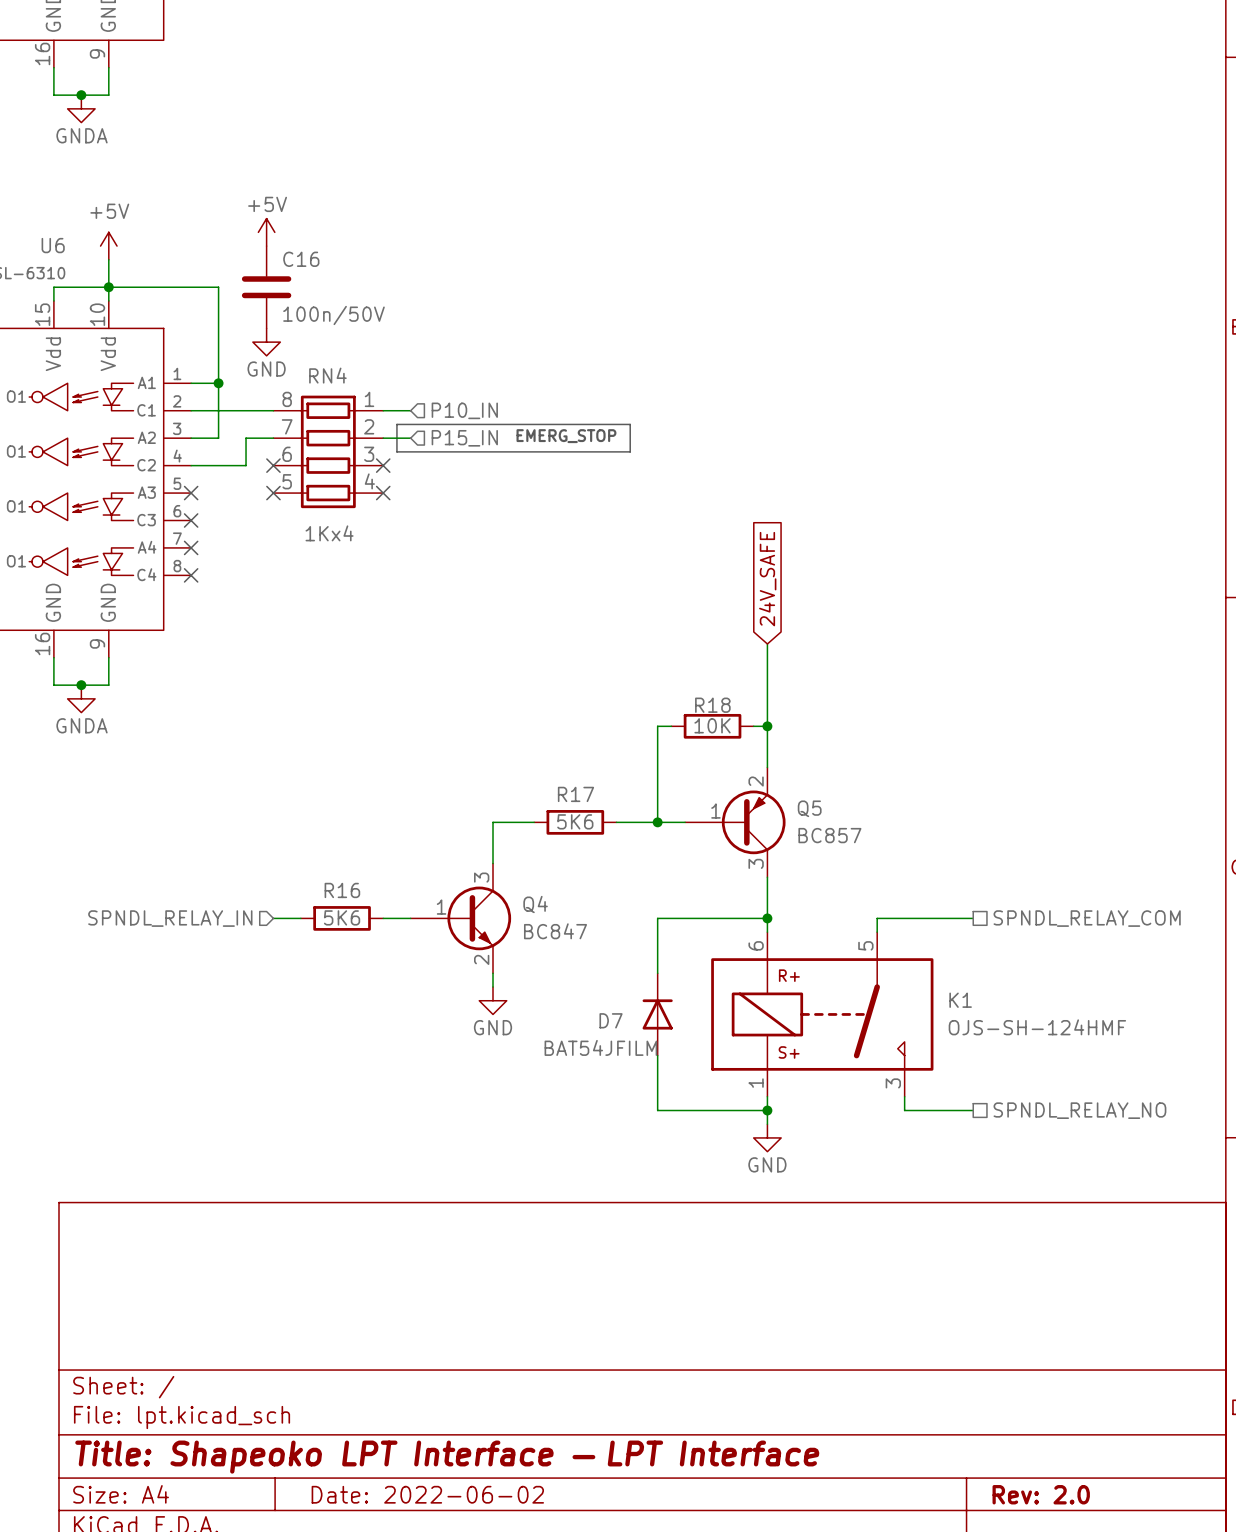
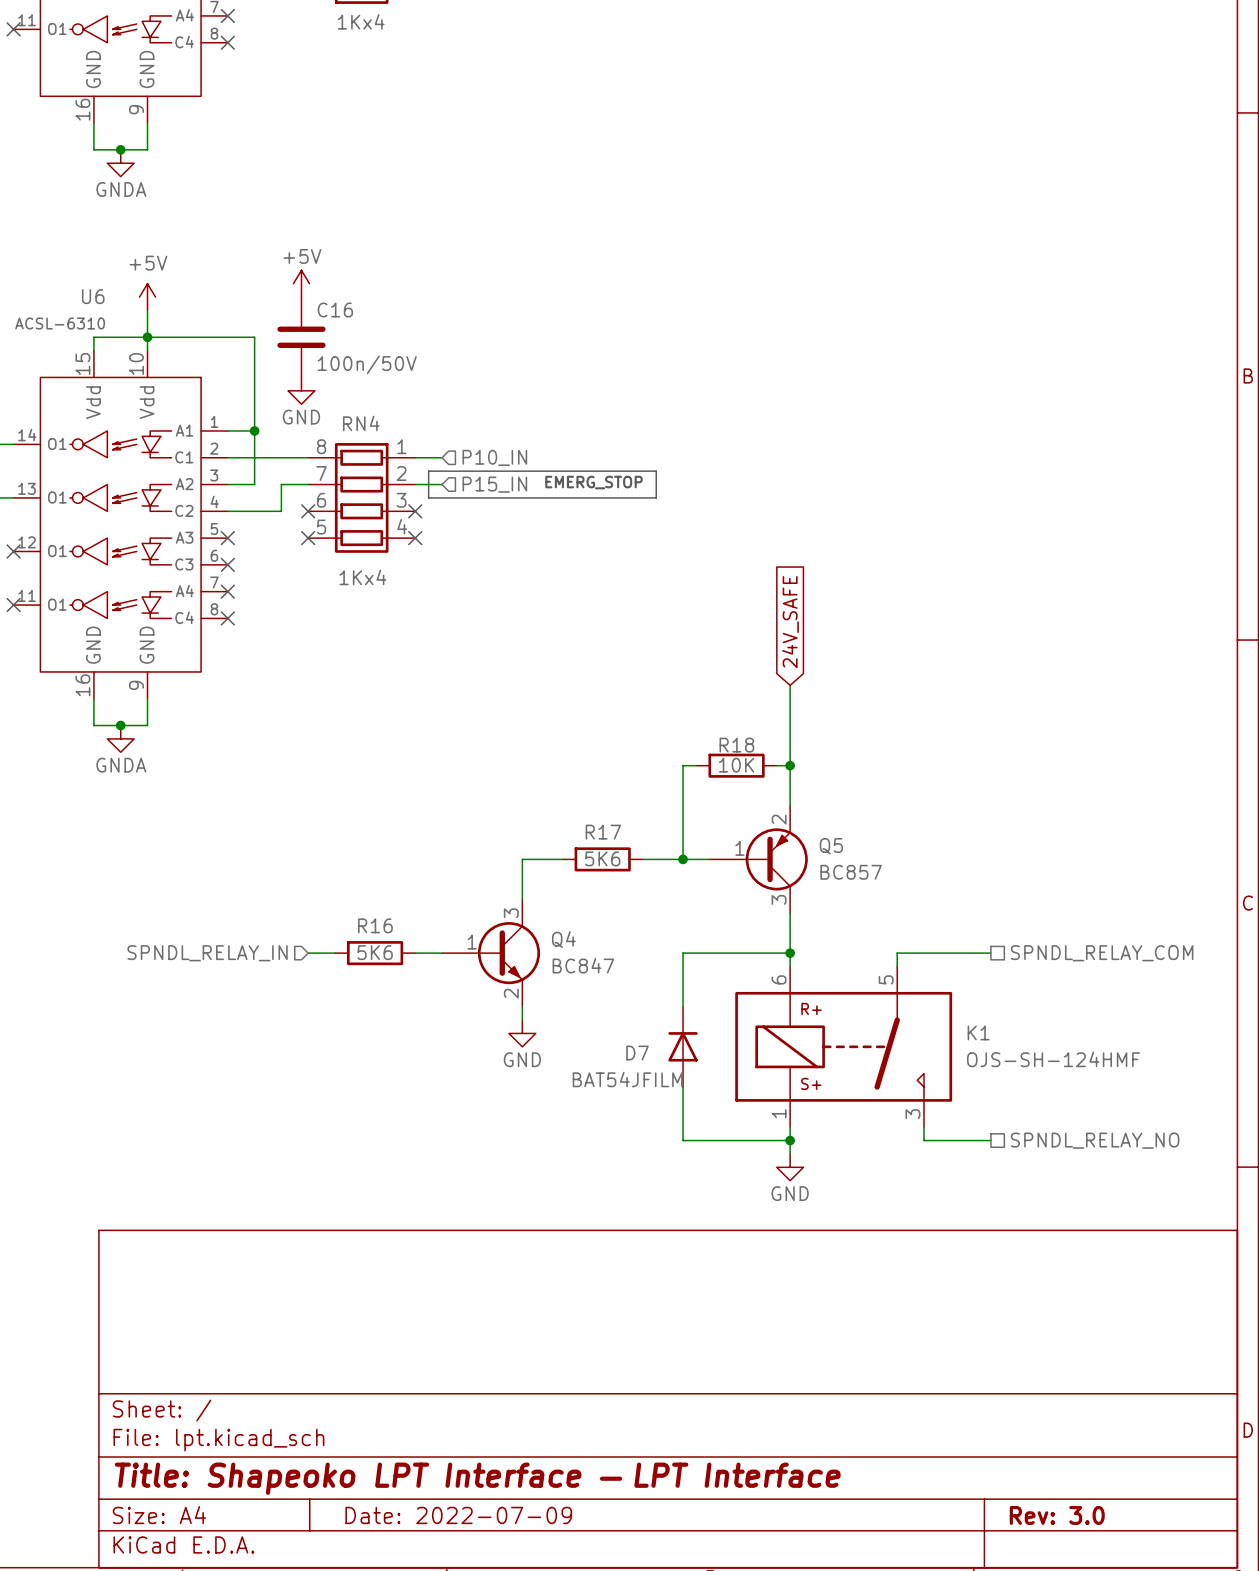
title block: Date: 2022-06-02 (427, 1494) -> Date: 2022-07-09 (458, 1515)
title block: Rev: 2.0 (1041, 1494) -> Rev: 3.0 (1057, 1515)

